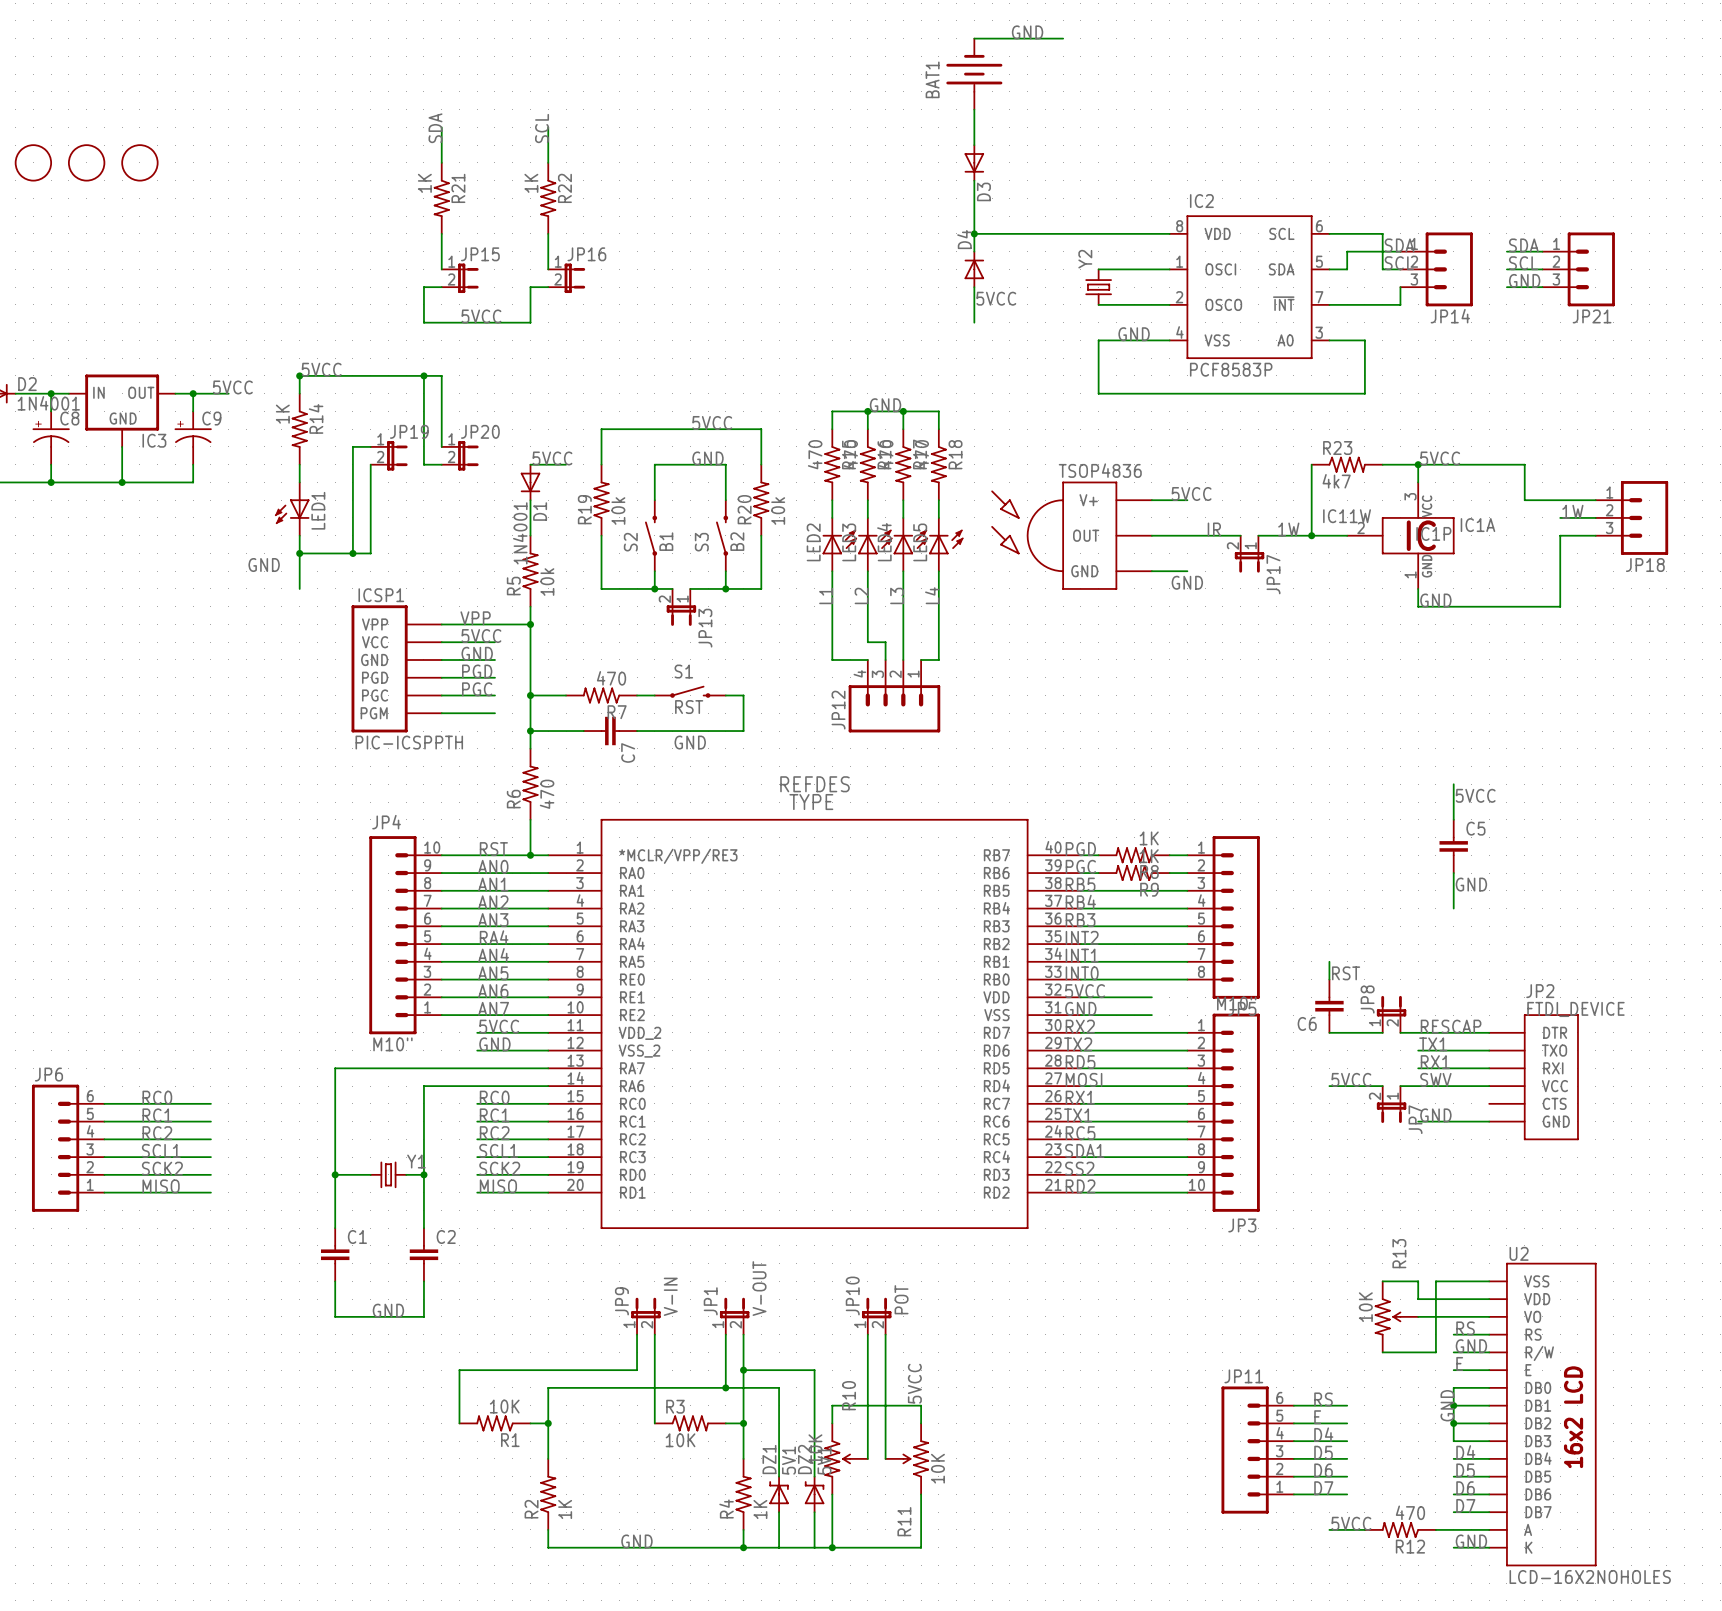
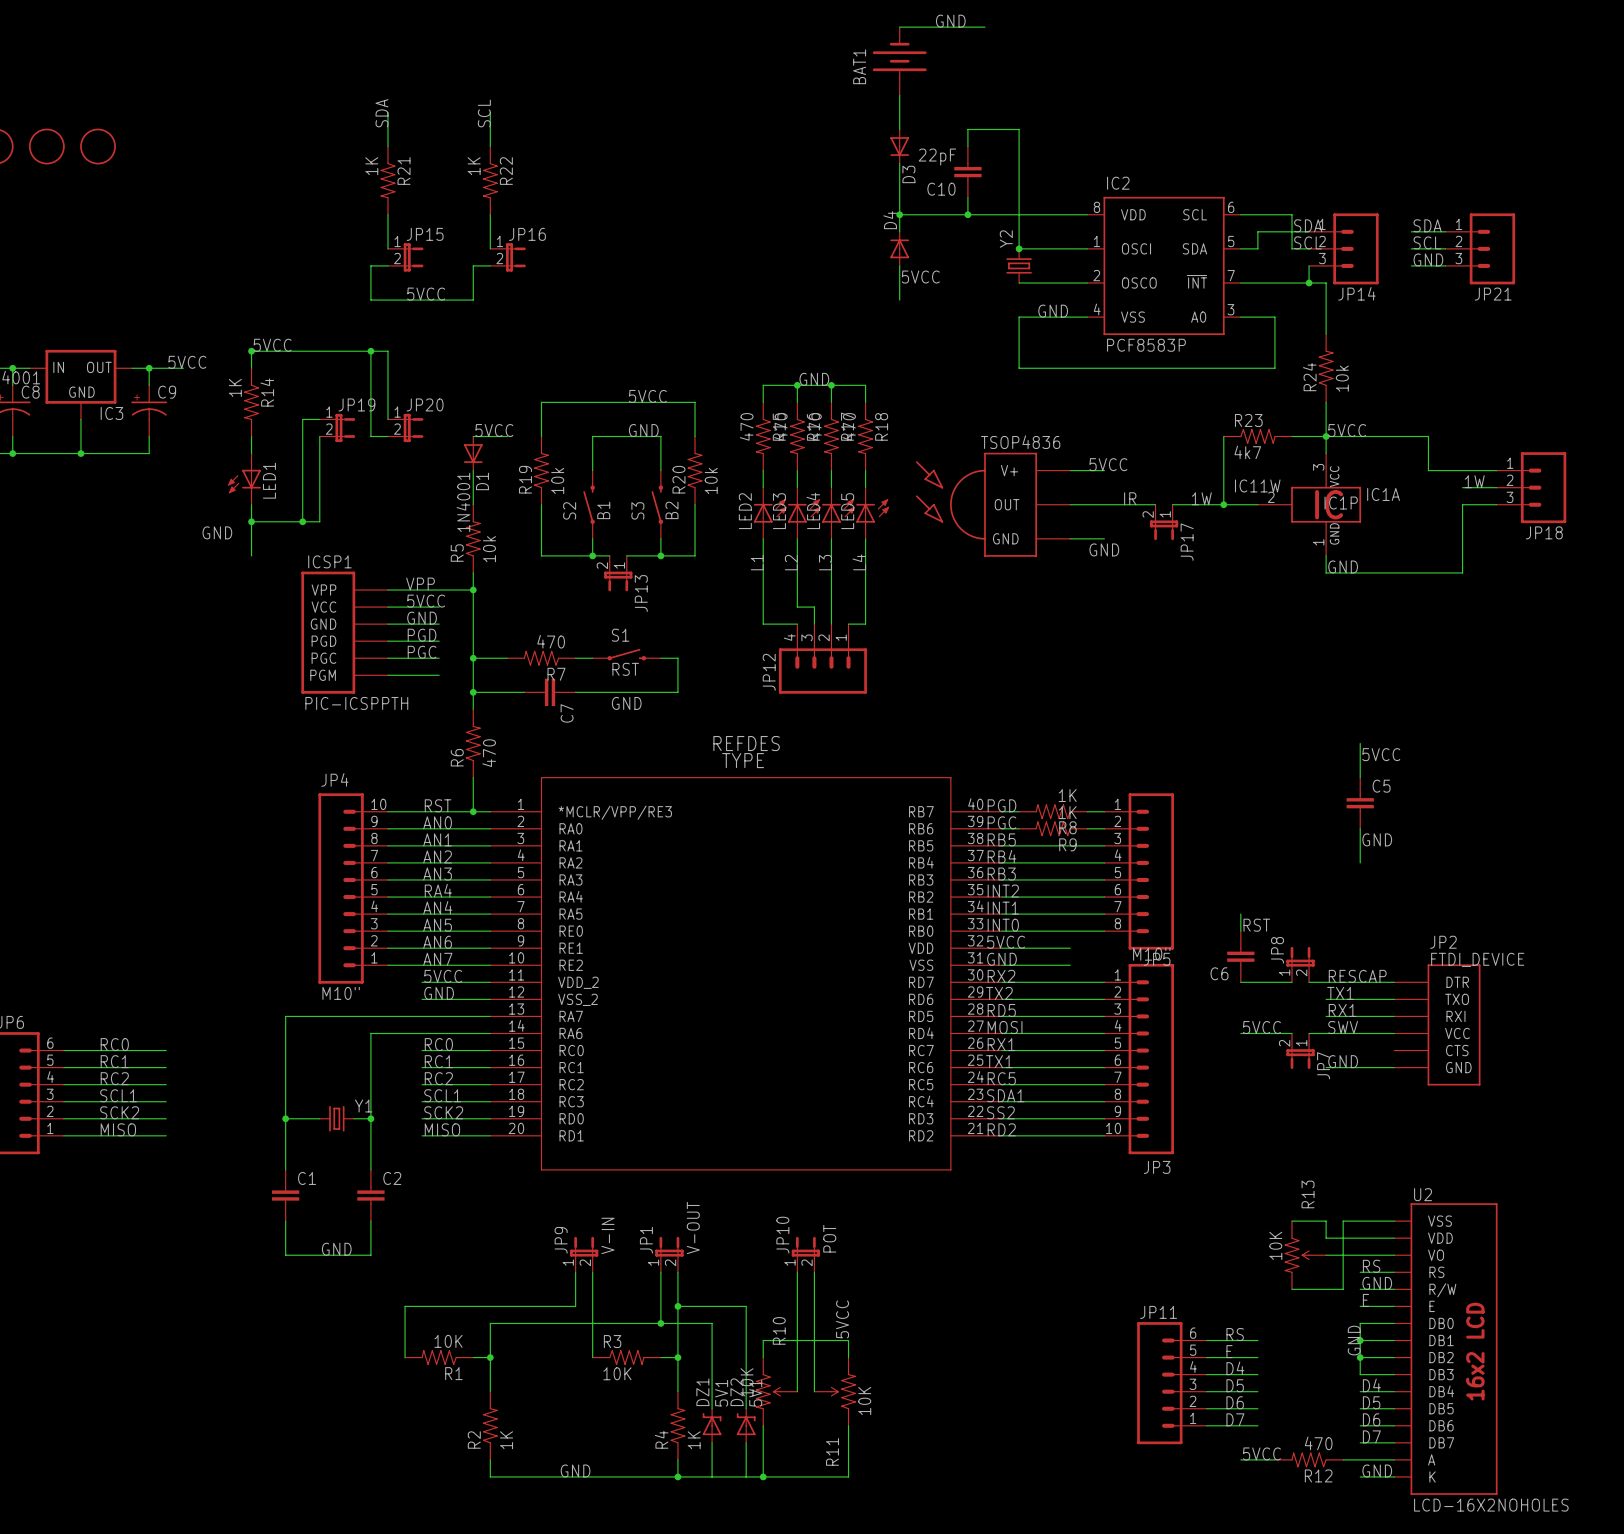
wire: none -> (967, 146) (967, 129) (1019, 129) (1019, 248)
C10: none -> 22pF (967, 172)
wire: none -> (967, 197) (967, 214)
junction: none -> (967, 214)
junction: none -> (1019, 248)
wire: none -> (1309, 282) (1326, 282) (1326, 334)
junction: none -> (1309, 282)
R24: none -> 10k (1326, 368)
wire: none -> (1326, 402) (1326, 436)

